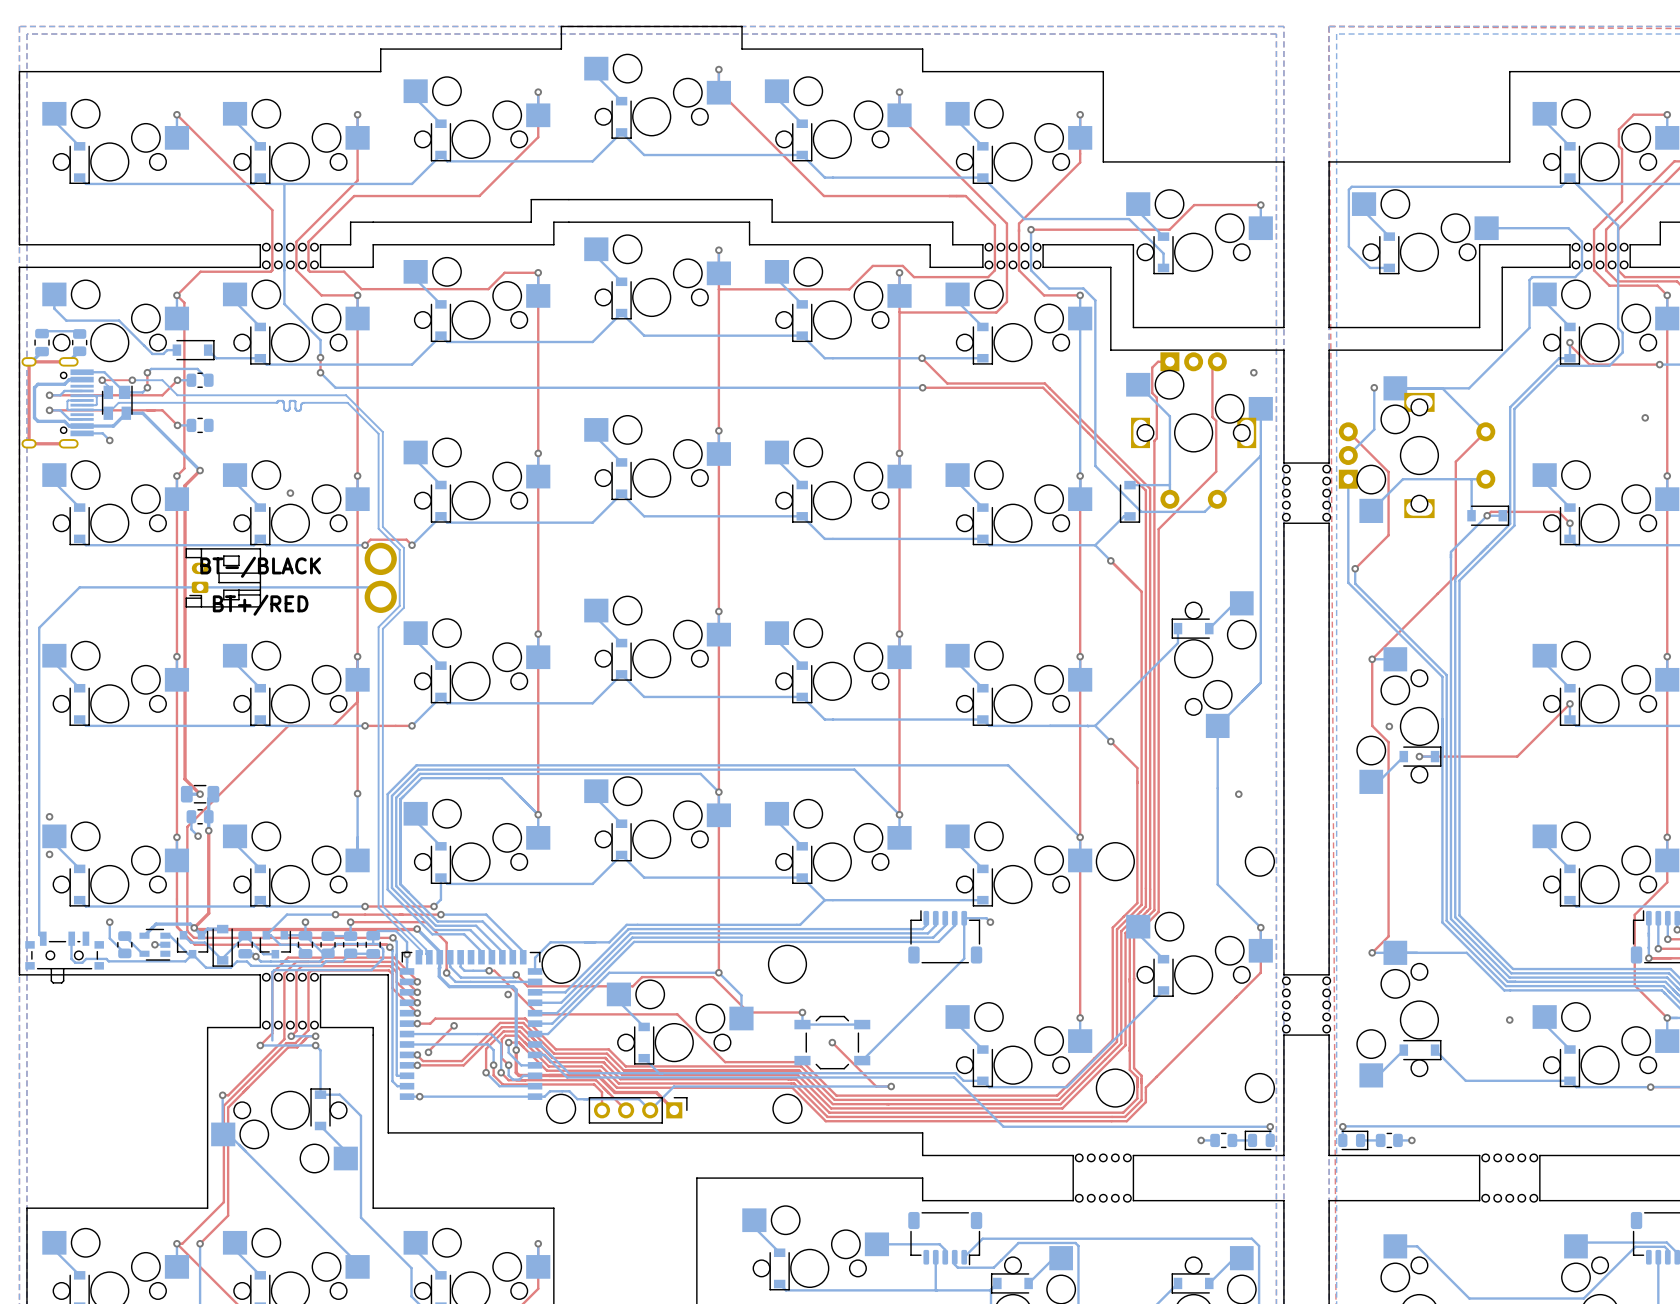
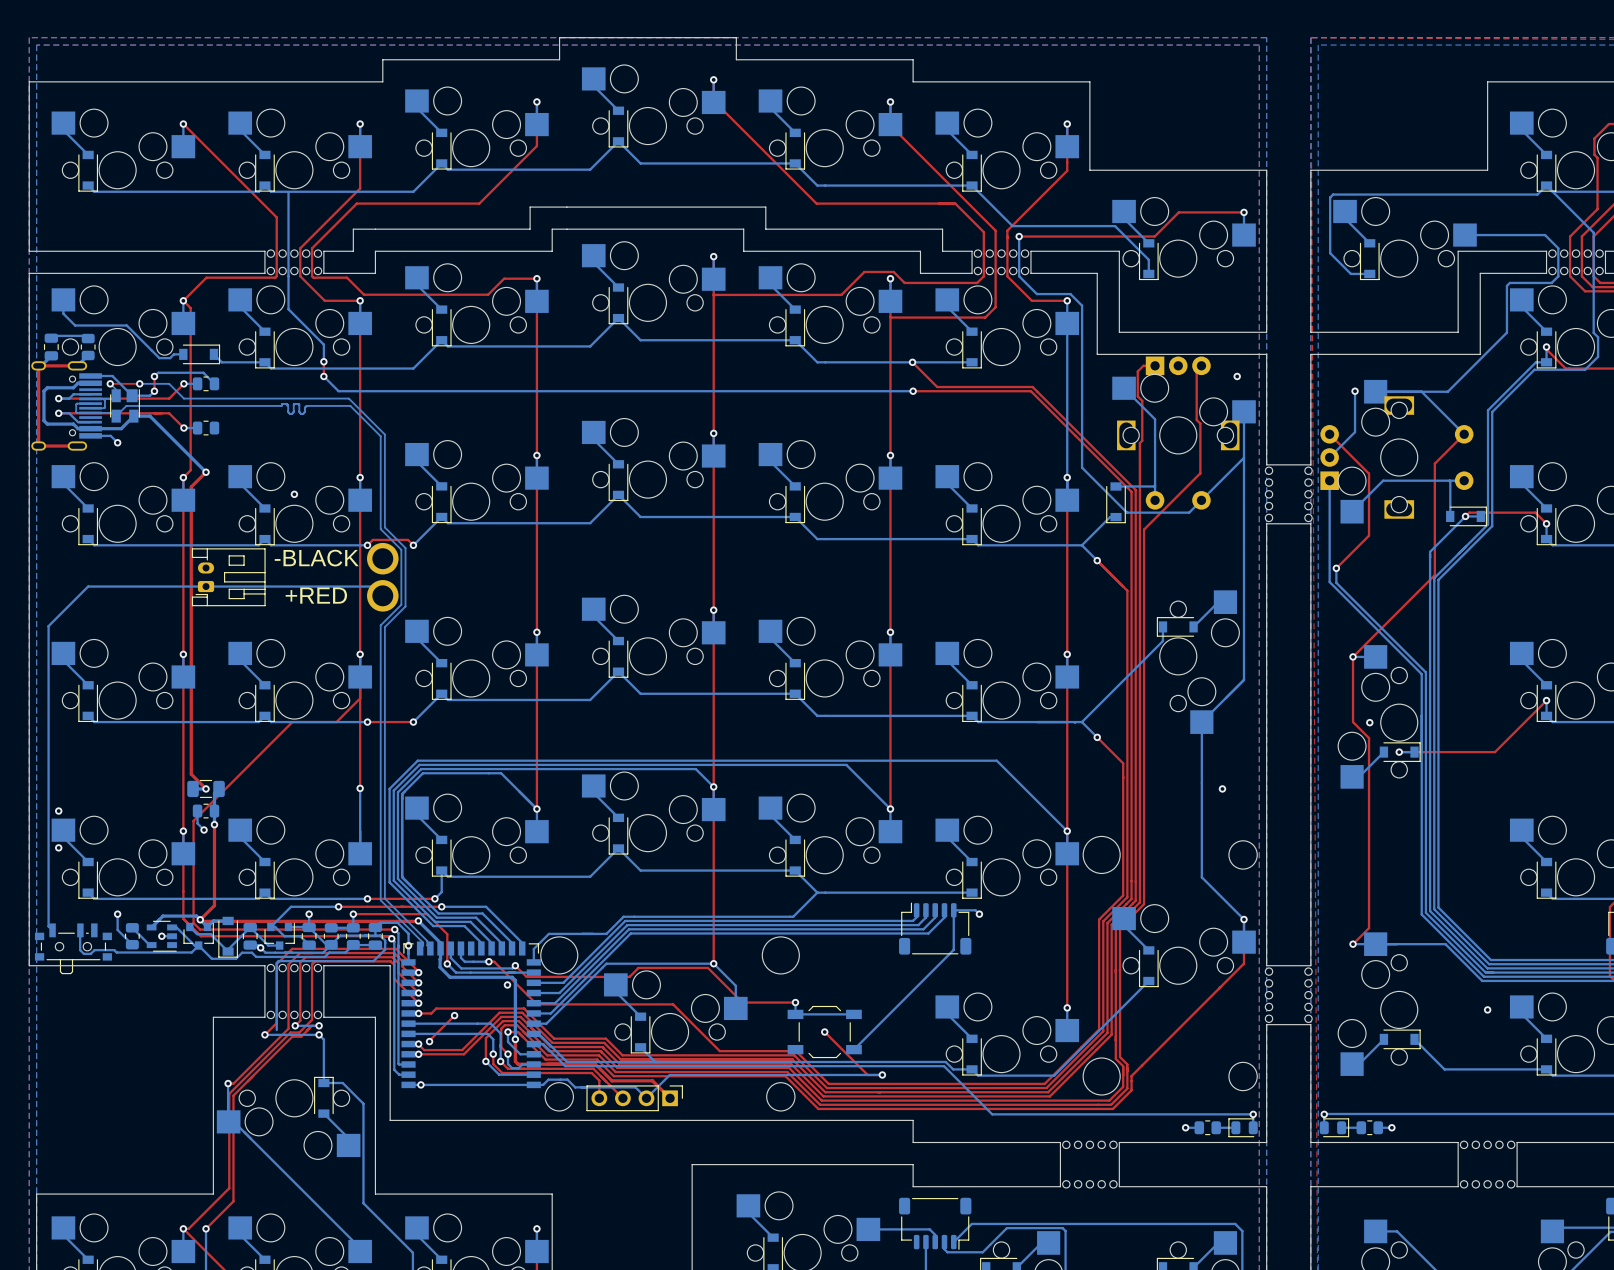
text: BT-/BLACK (260, 567) -> -BLACK (316, 558)
text: BT+/RED (260, 605) -> +RED (316, 595)

